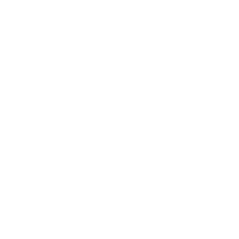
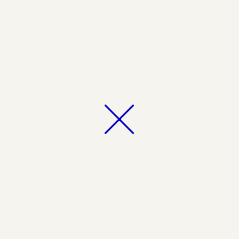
no-connect mark: none -> (119, 119)

